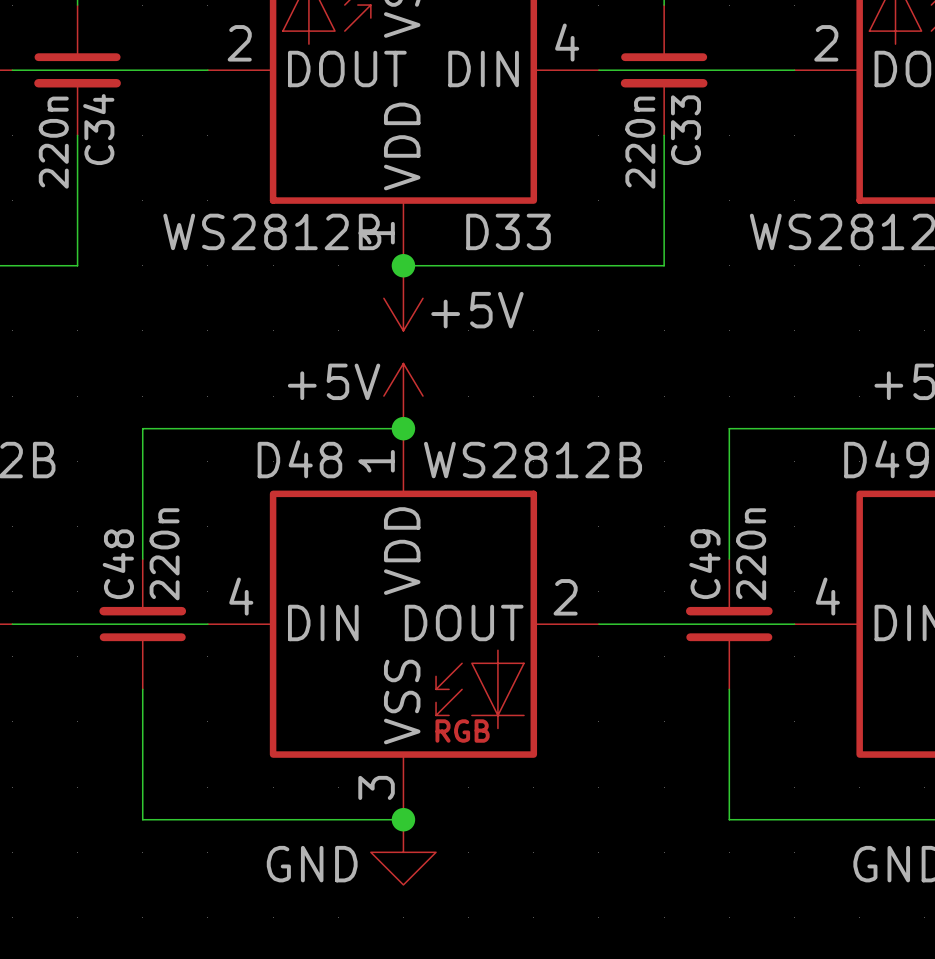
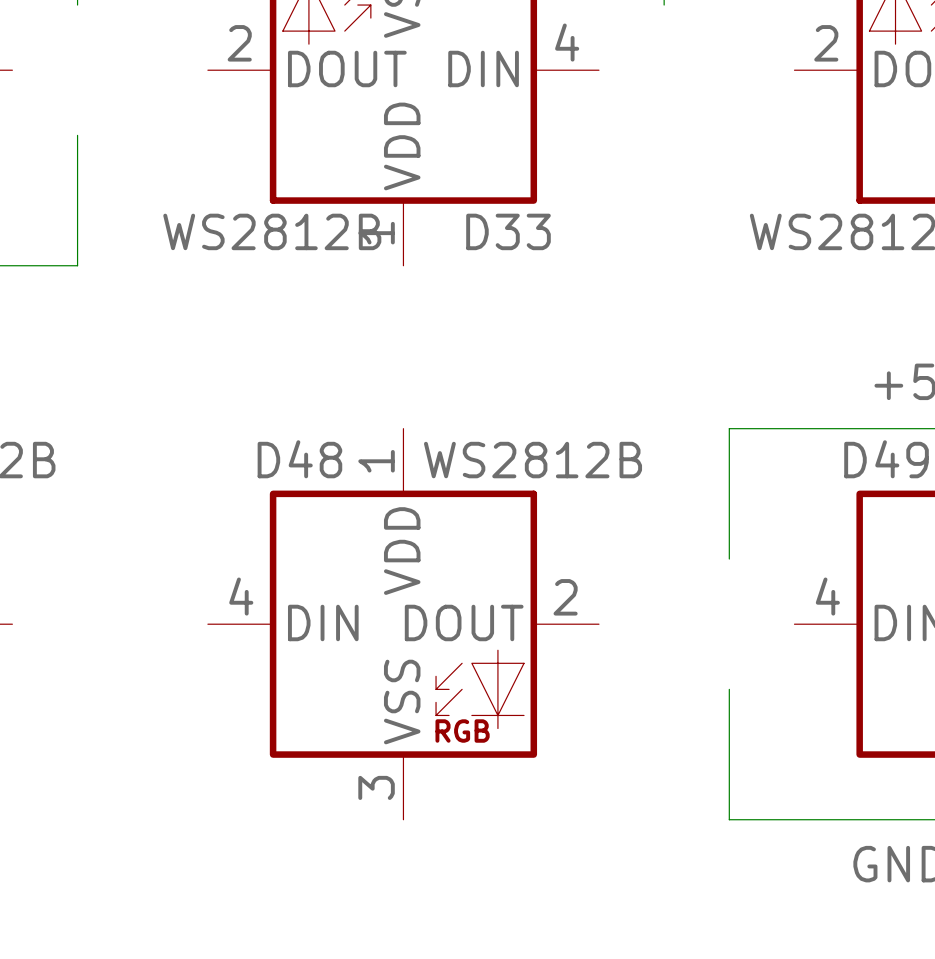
wire: (12, 70) (207, 70) -> none
C34: 220n (77, 70) -> none
wire: (598, 70) (794, 70) -> none
C33: 220n (664, 70) -> none
wire: (664, 135) (664, 265) (403, 265) -> none
junction: (403, 265) -> none
power symbol: +5V (403, 298) -> none
power symbol: +5V (403, 396) -> none
wire: (403, 428) (142, 428) (142, 559) -> none
junction: (403, 428) -> none
wire: (12, 624) (207, 624) -> none
C48: 220n (142, 624) -> none
wire: (598, 624) (794, 624) -> none
C49: 220n (729, 624) -> none
wire: (142, 689) (142, 819) (403, 819) -> none
junction: (403, 819) -> none
power symbol: GND (403, 852) -> none

